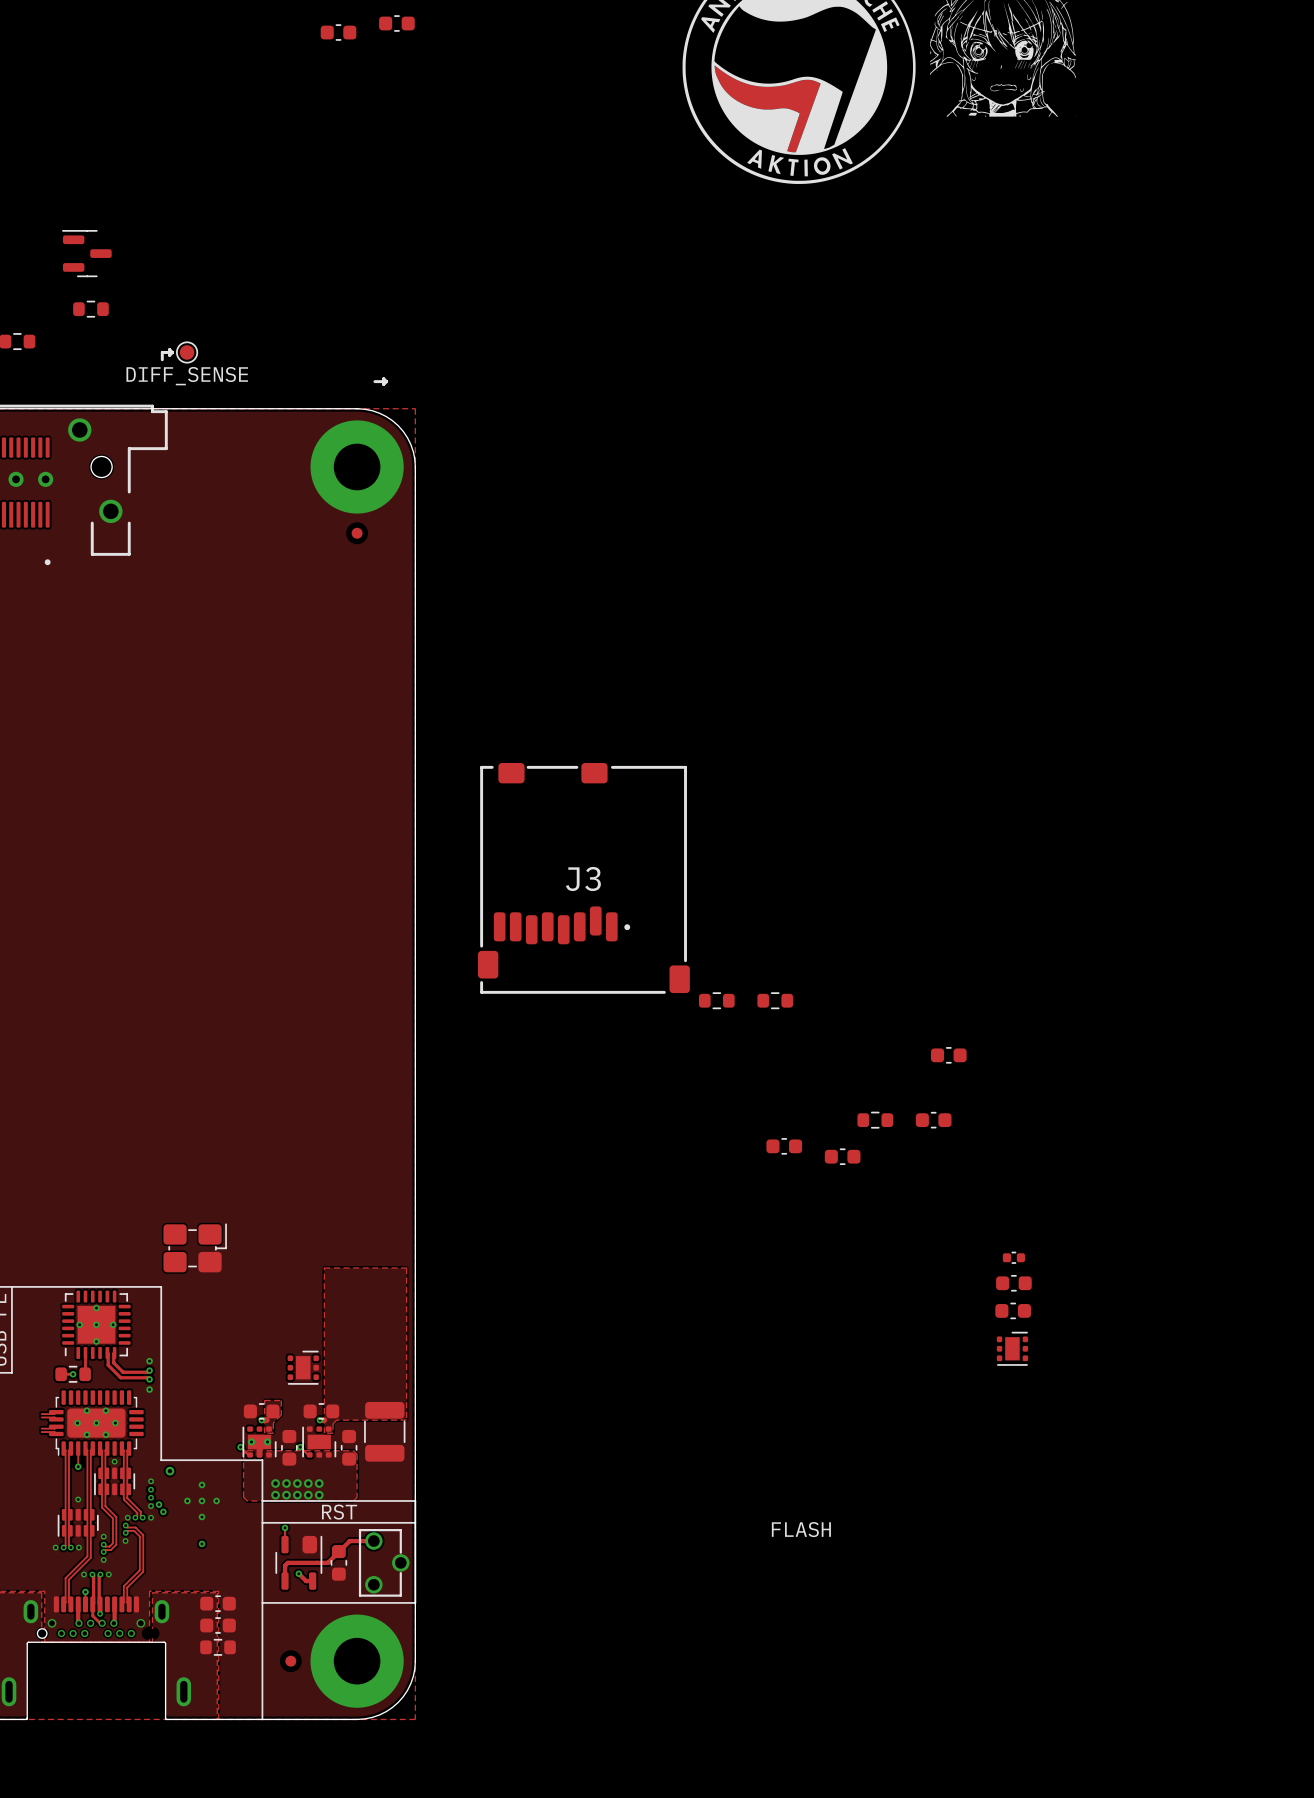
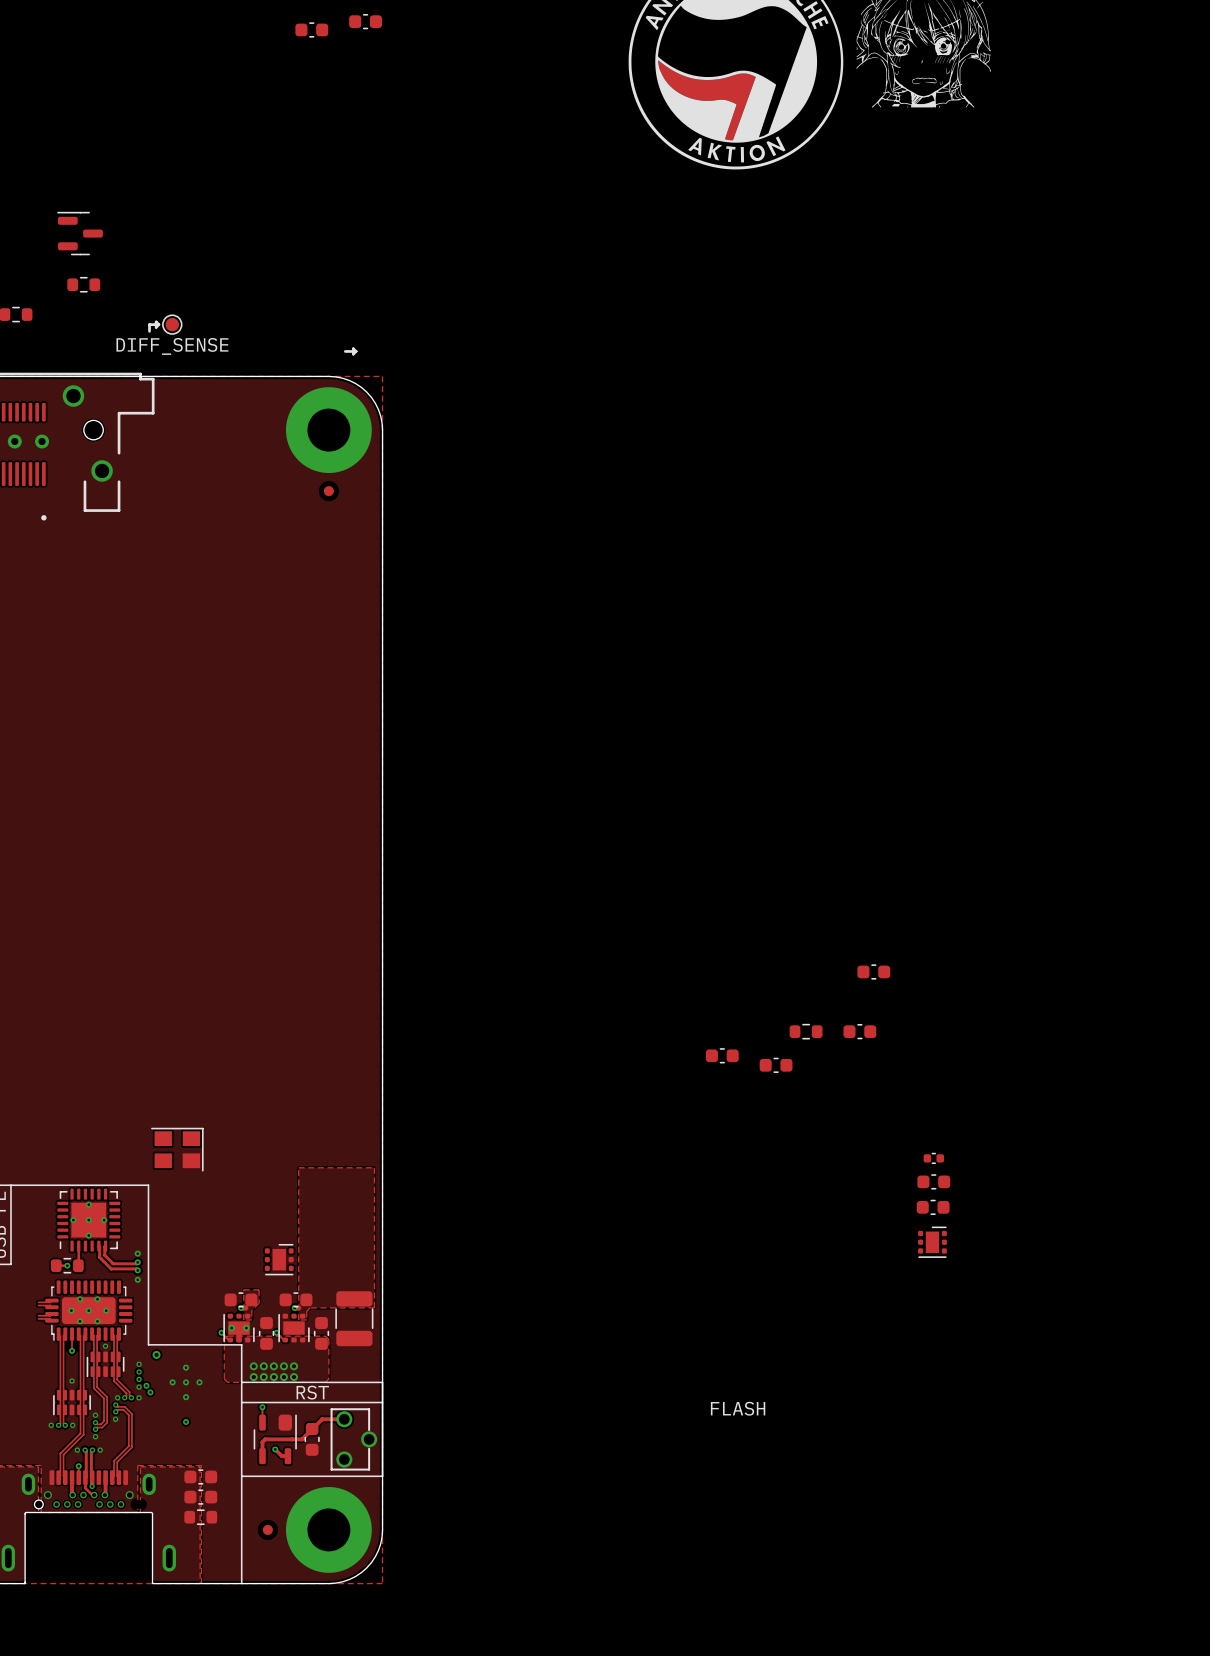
J3: (583, 878) -> none
part: (716, 1000) -> none
part: (775, 1000) -> none
part footprint: [163, 1223, 227, 1273] -> [151, 1127, 204, 1172]

